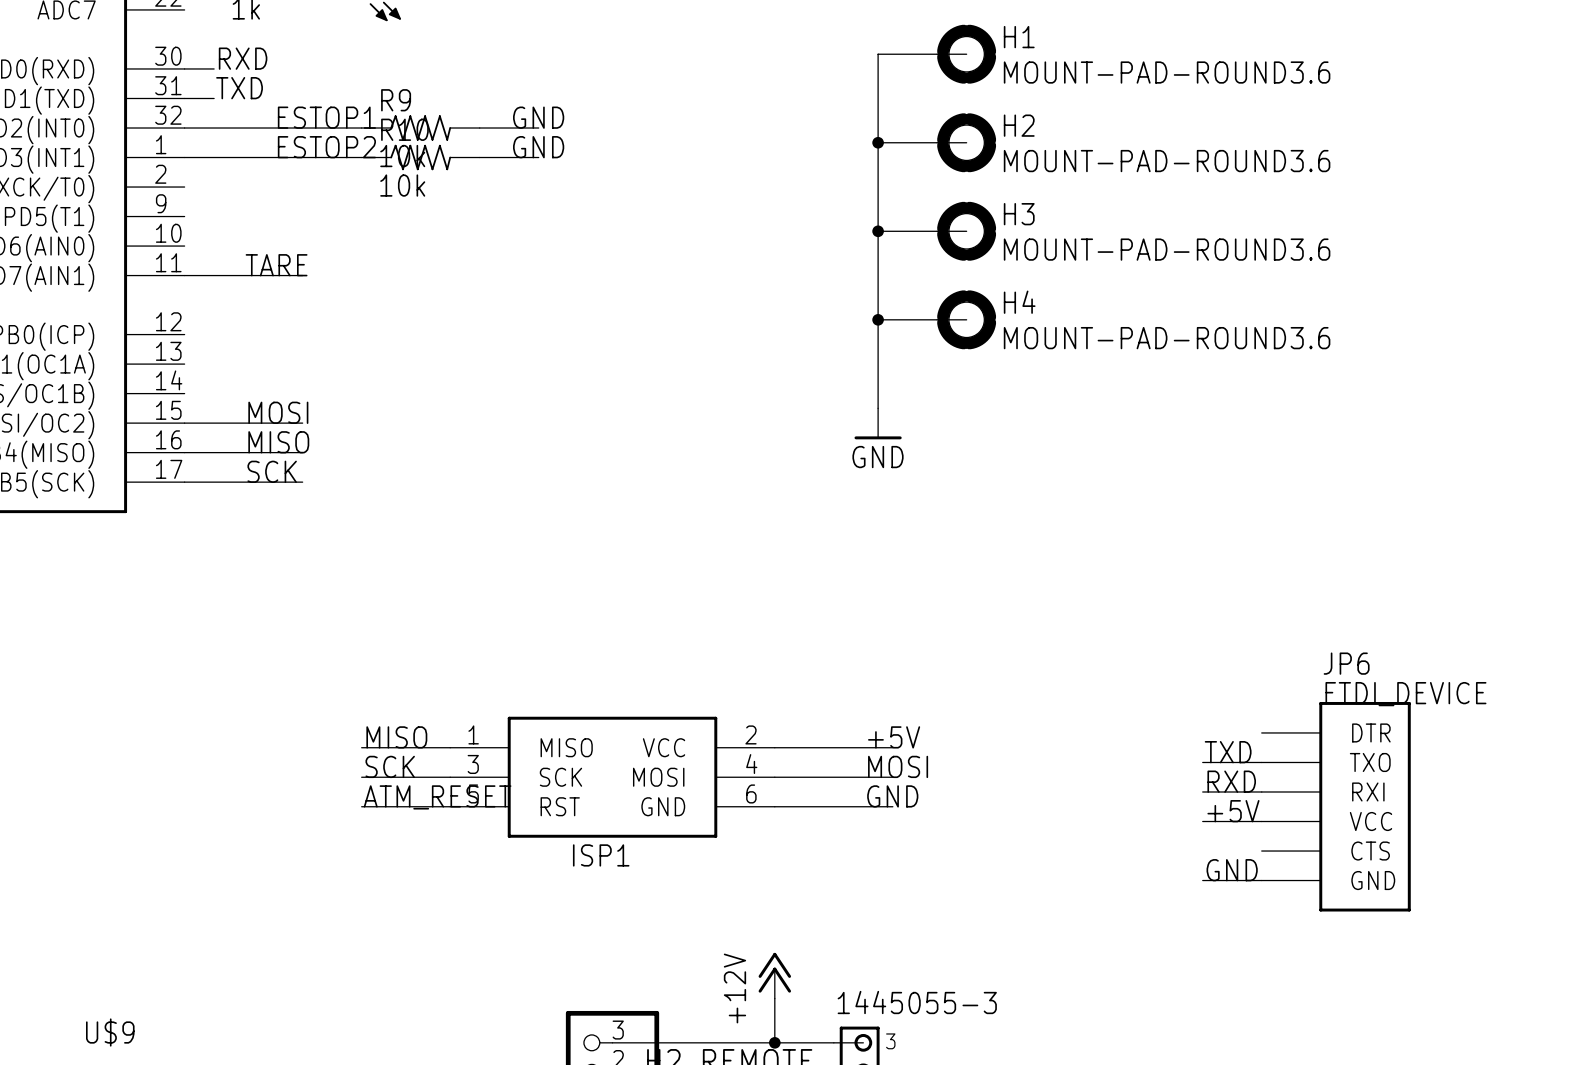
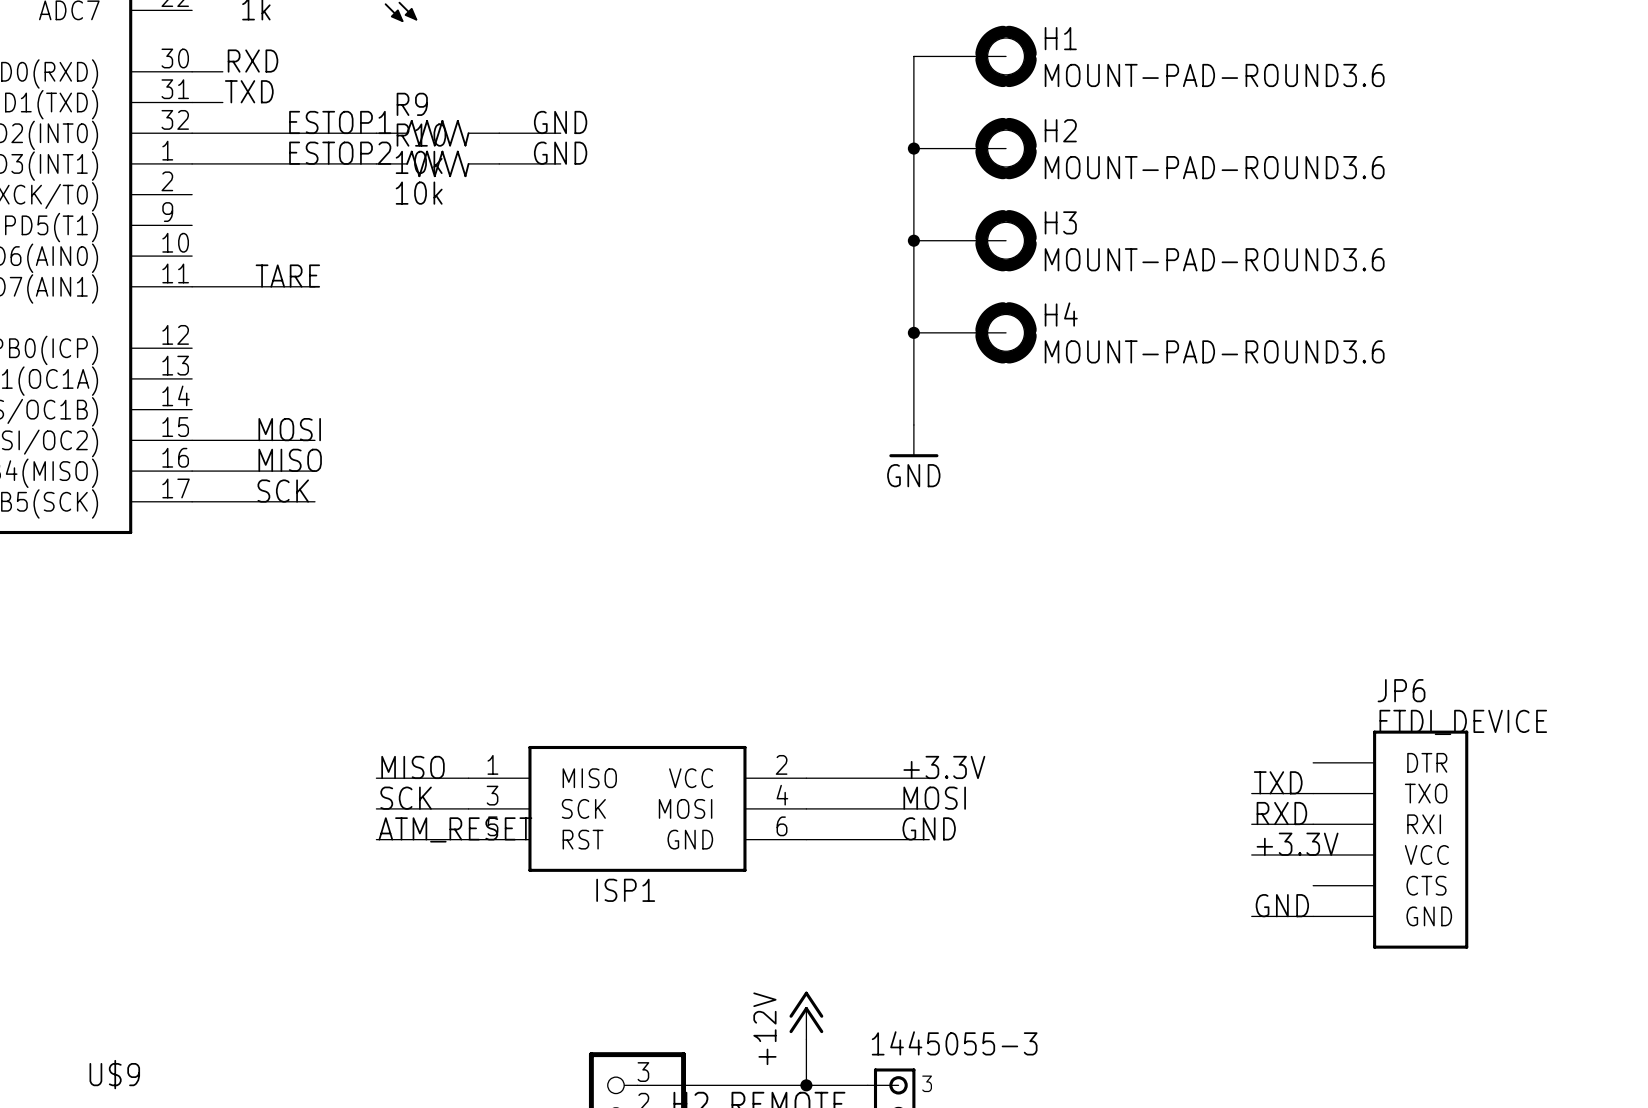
label: +5V (894, 737) -> +3.3V (944, 767)
label: +5V (1233, 811) -> +3.3V (1297, 844)

